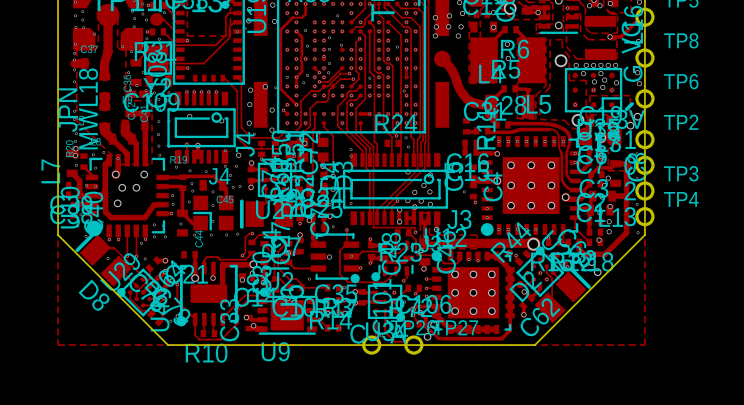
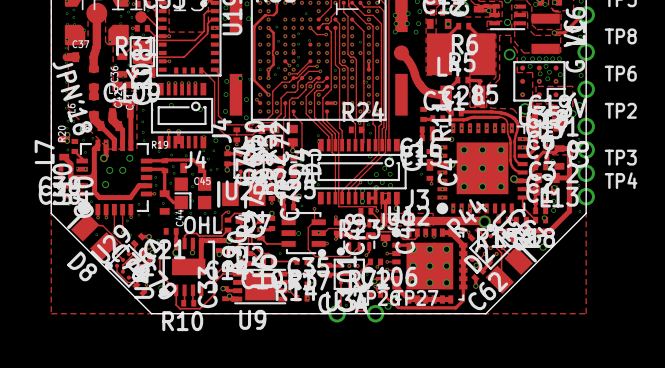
track: (359, 38) (356, 42) (356, 70) (358, 73) (358, 79) (351, 86) -> (326, 34) (317, 34) (310, 27)
track: none -> (318, 78) (308, 82) (306, 84) (306, 89) (297, 98) (291, 98) (289, 100) (289, 119)
text: MWL18 (88, 108) -> none
text: JPN (68, 110) -> JPN'18 (72, 98)
text: none -> OHL (203, 225)

